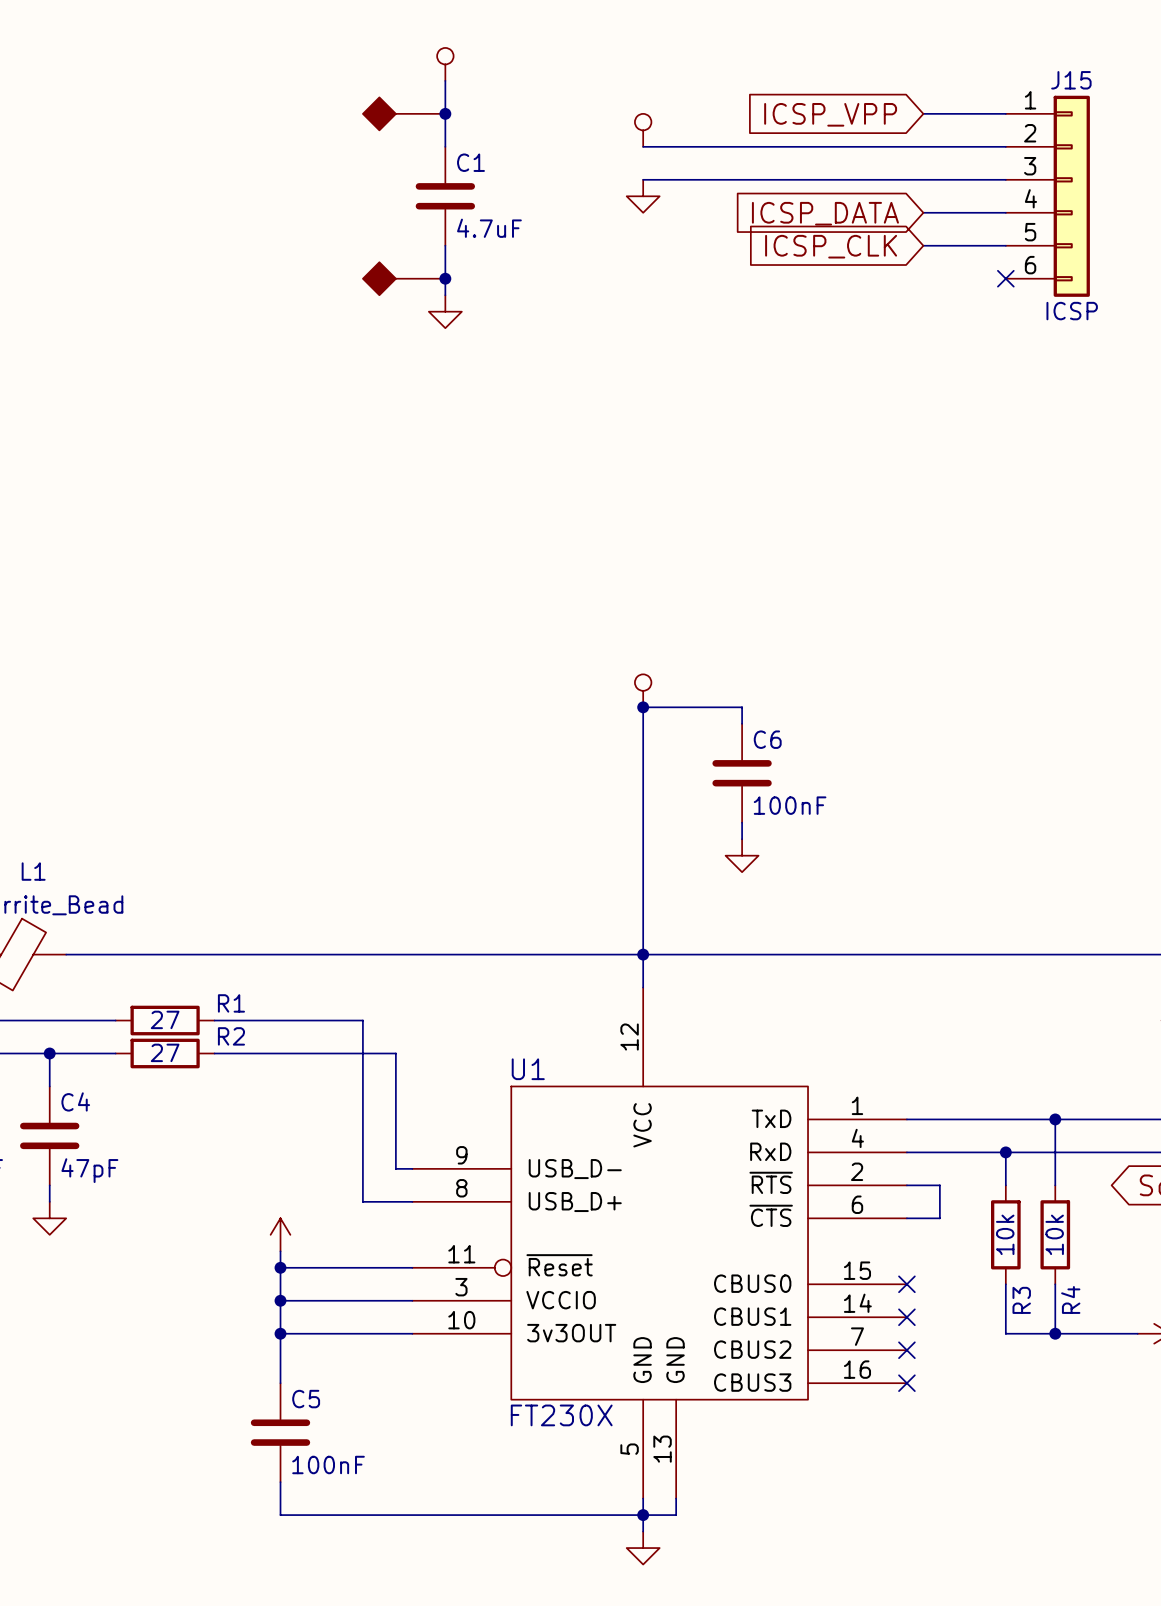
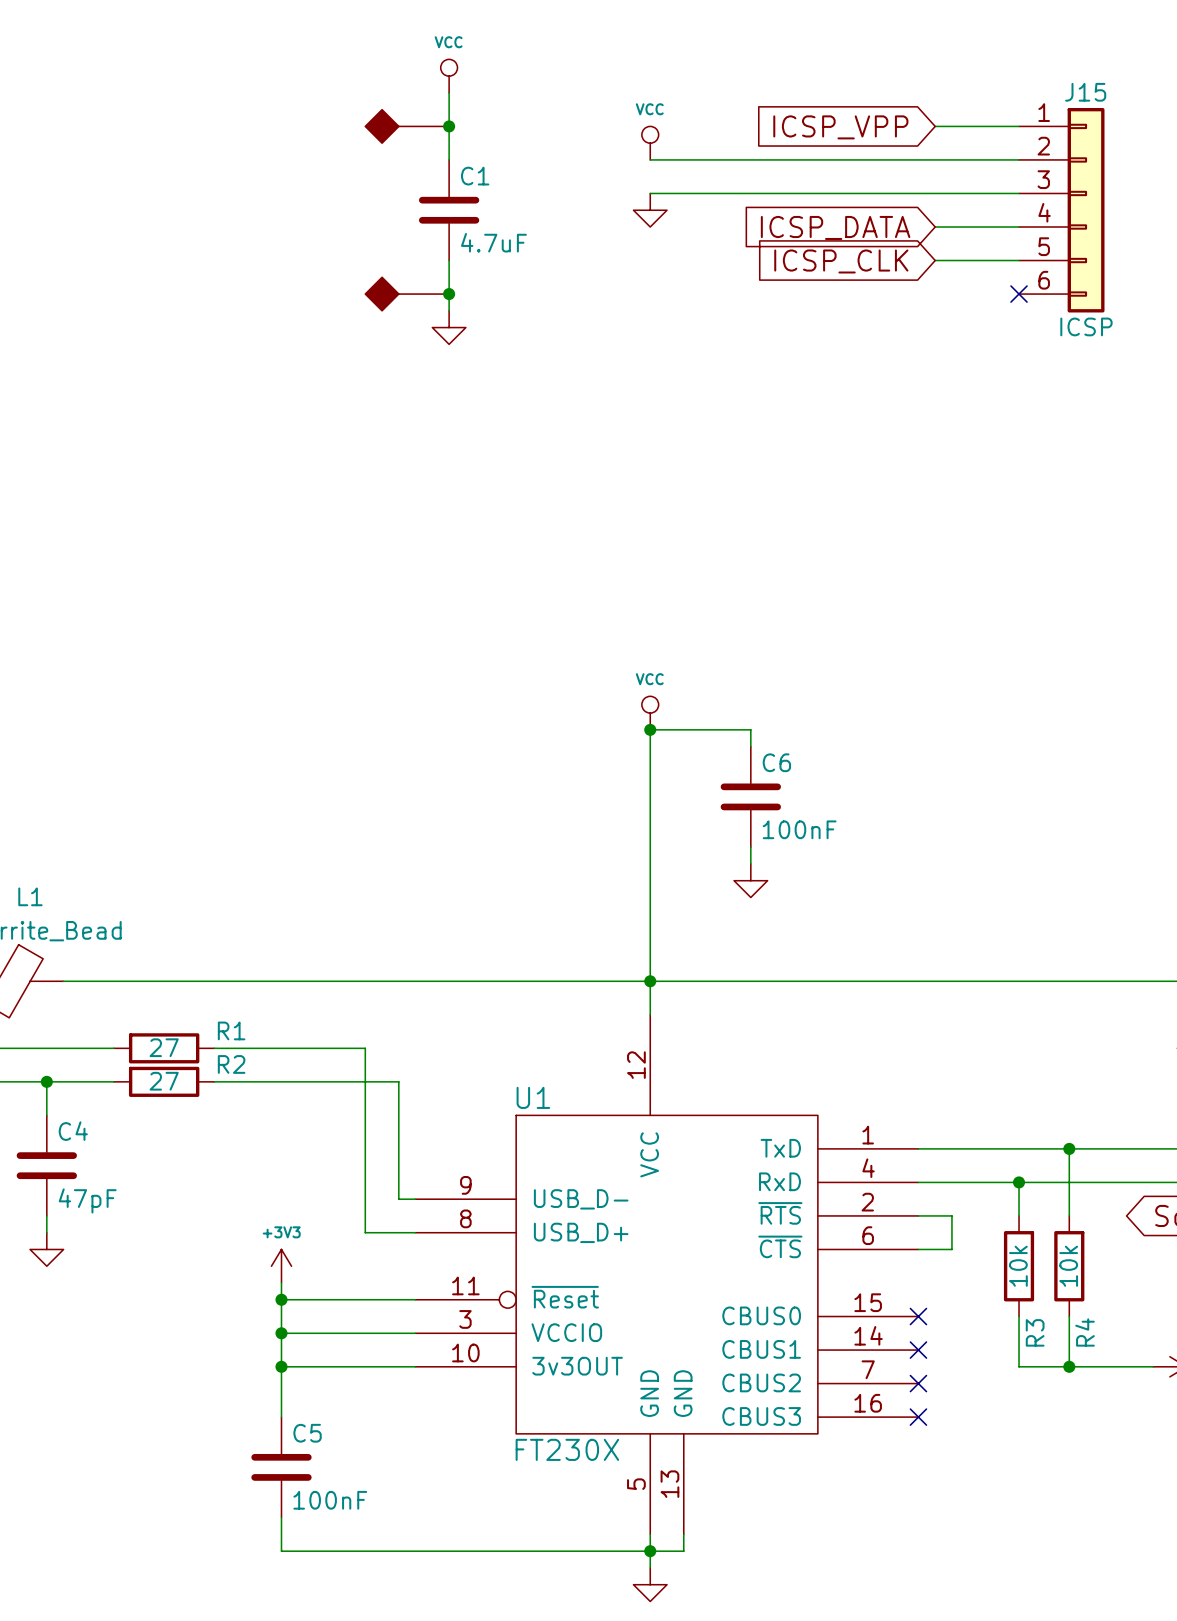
power symbol text: none -> VCC (448, 42)
power symbol text: none -> VCC (649, 109)
power symbol text: none -> VCC (649, 679)
power symbol text: none -> +3V3 (281, 1232)

